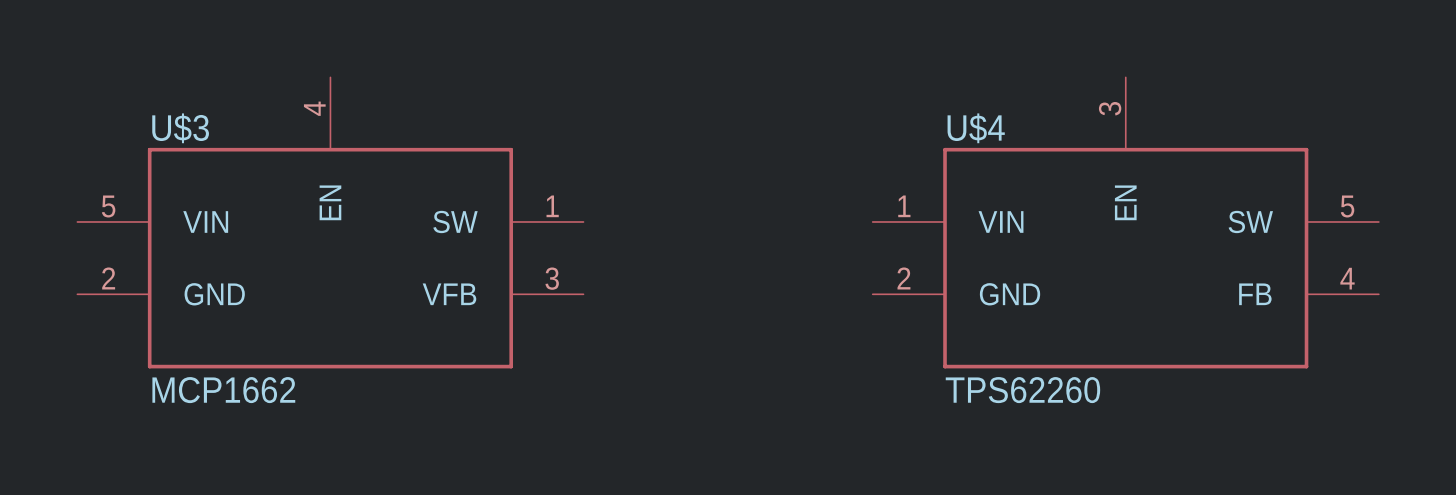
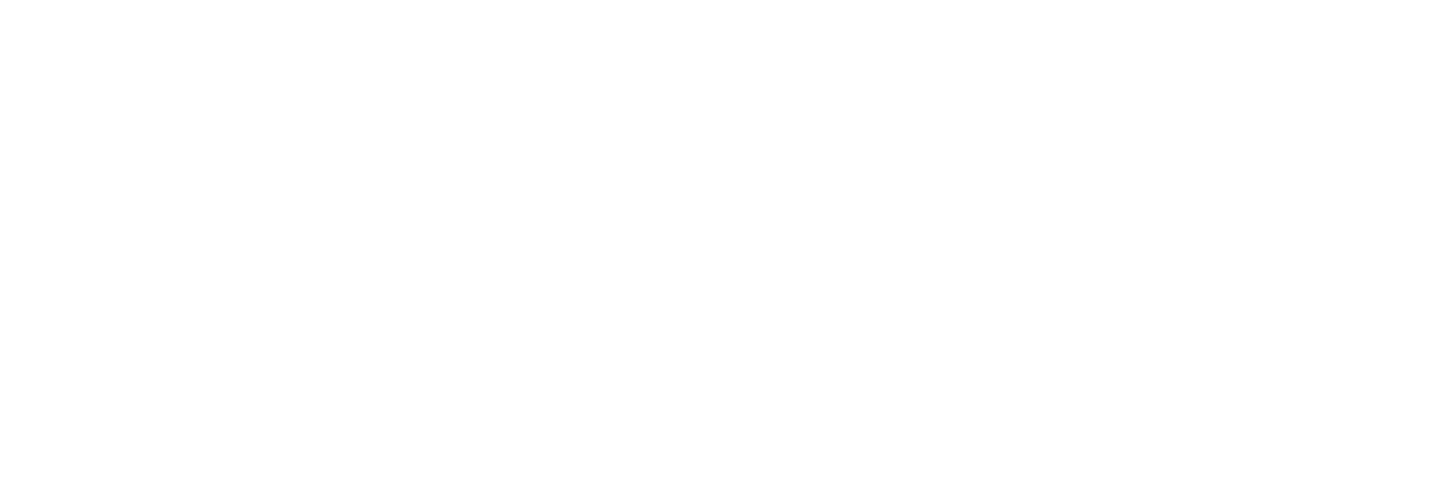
U$3: MCP1662 (330, 222) -> none
U$4: TPS62260 (1125, 222) -> none

